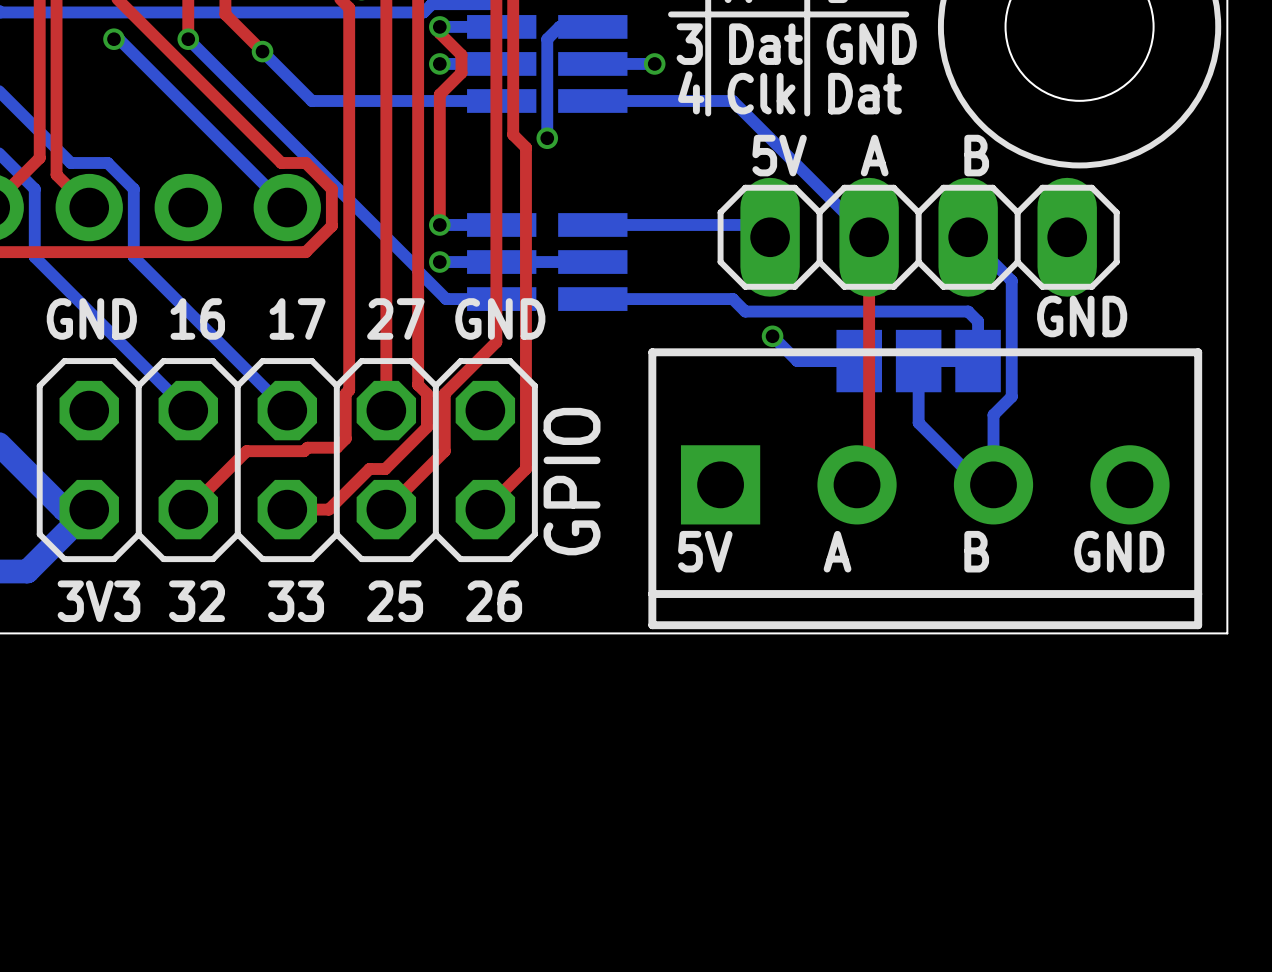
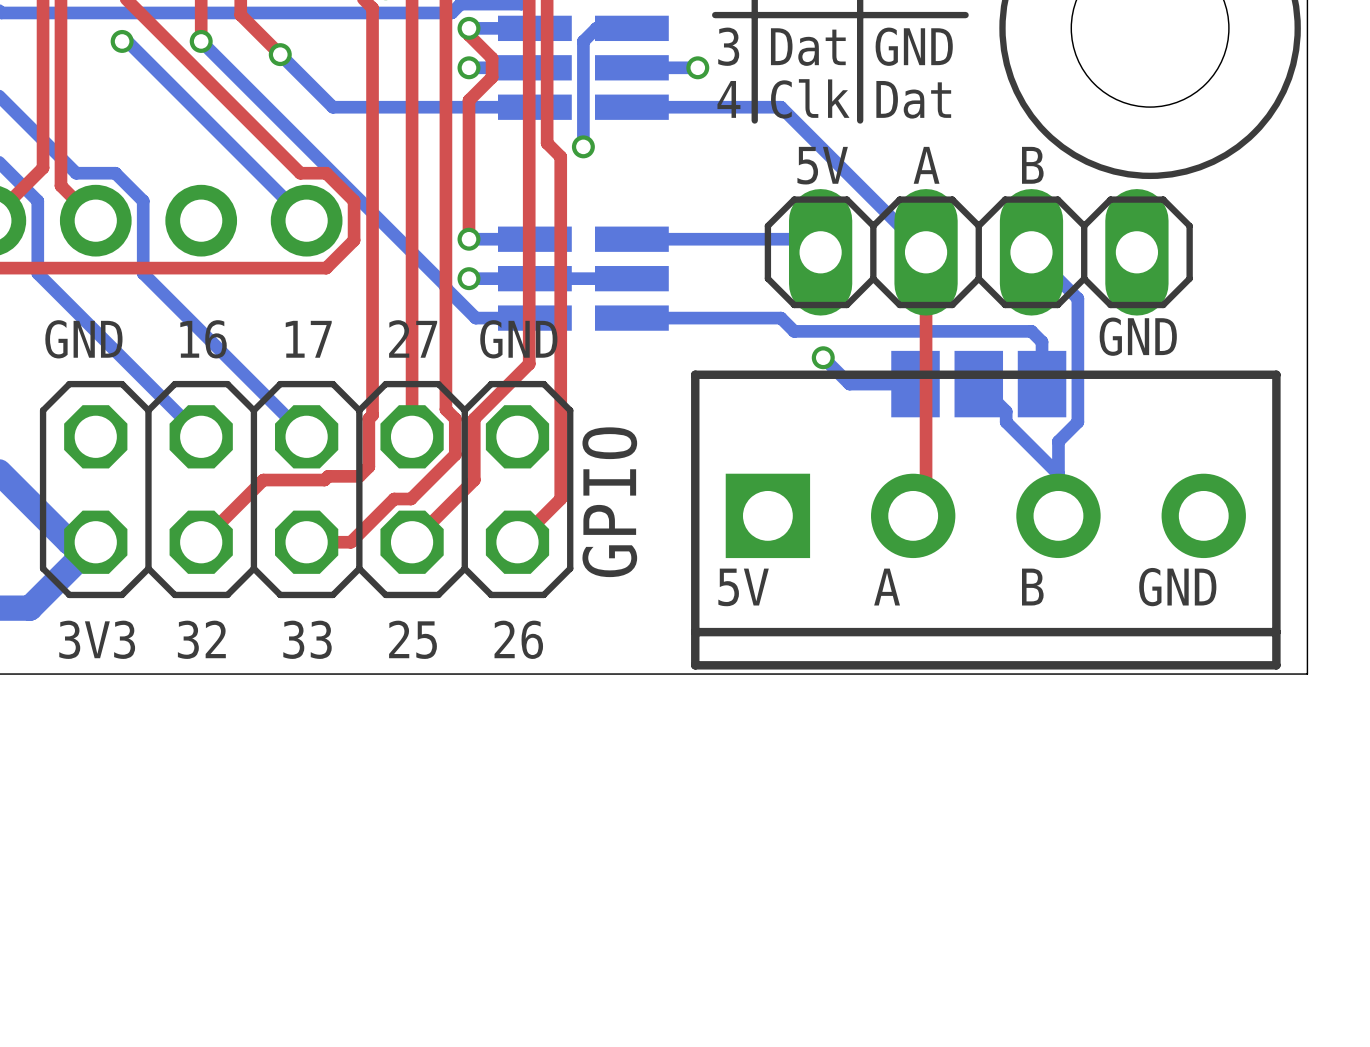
bottom track: none -> (978, 384) (1006, 411) (1006, 422) (1058, 474)
bottom track: (978, 361) (918, 361) (918, 422) (980, 484) (993, 484) -> none

